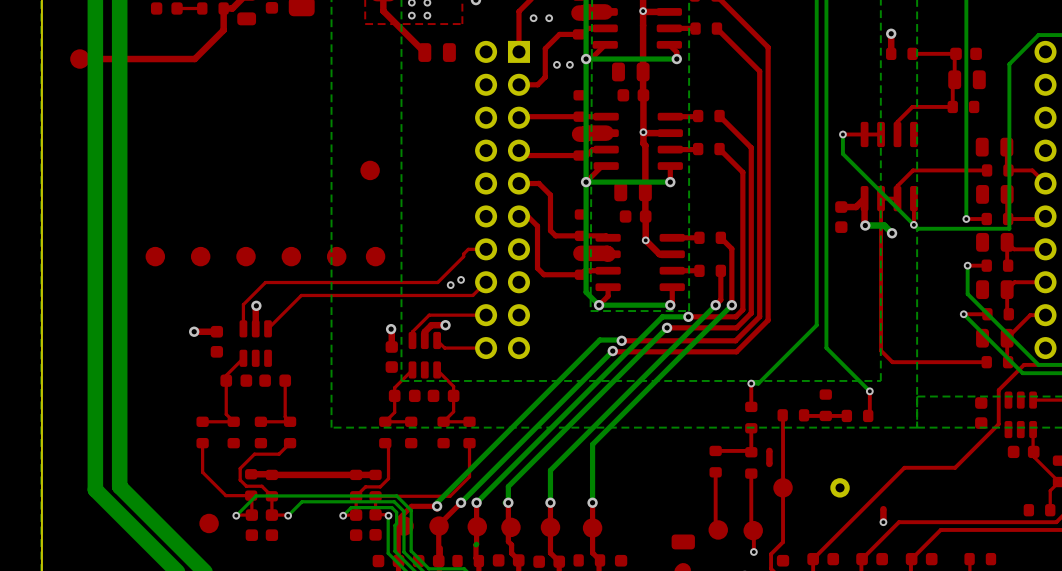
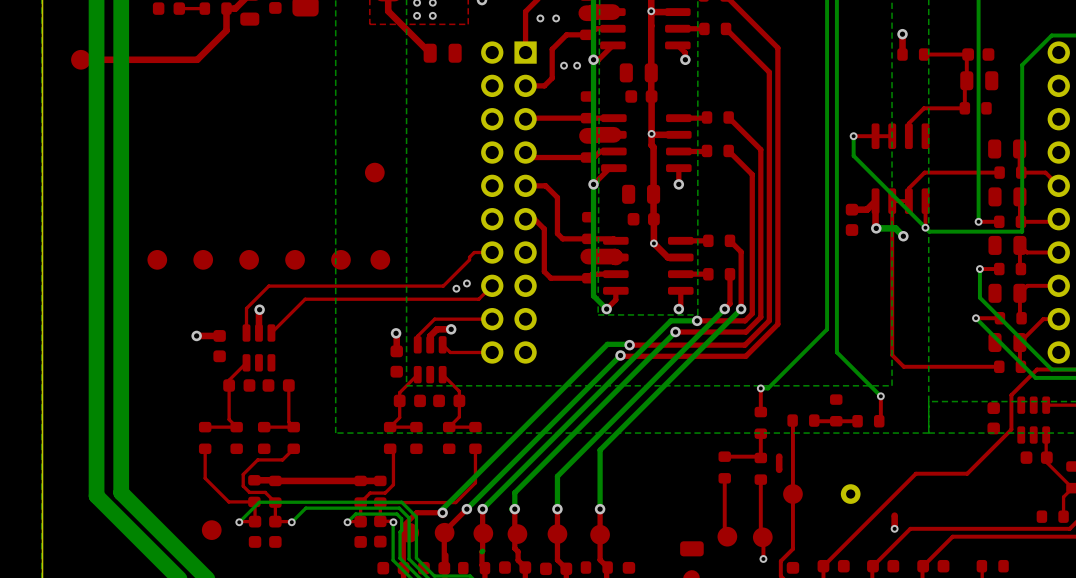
bottom track: (676, 59) (586, 59) -> none
bottom track: (670, 182) (586, 182) -> none
bottom track: (670, 305) (599, 305) -> none

